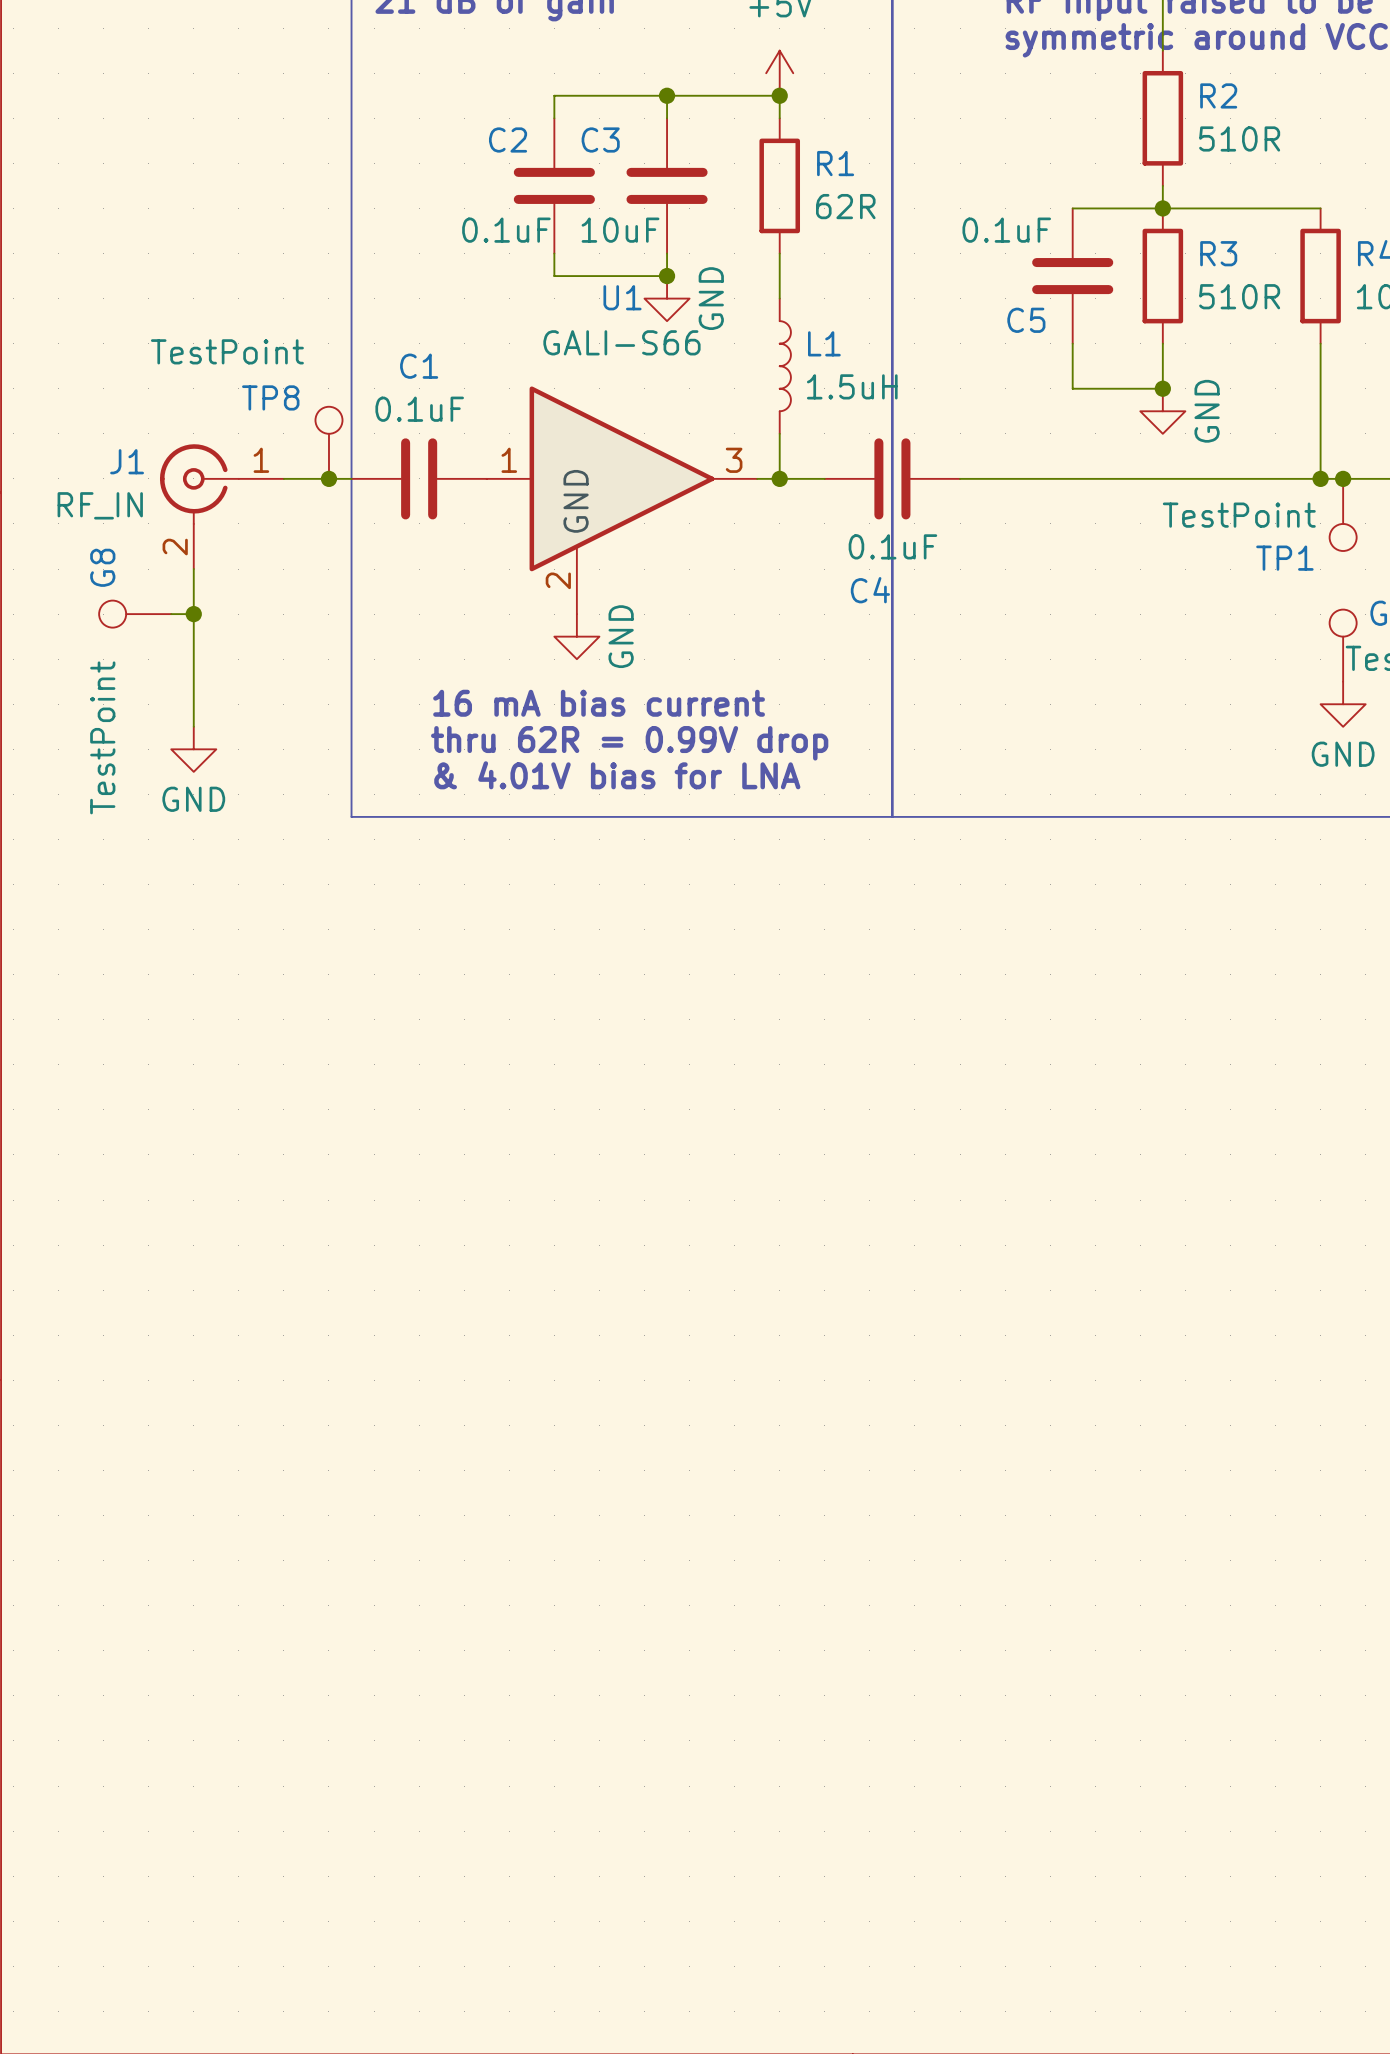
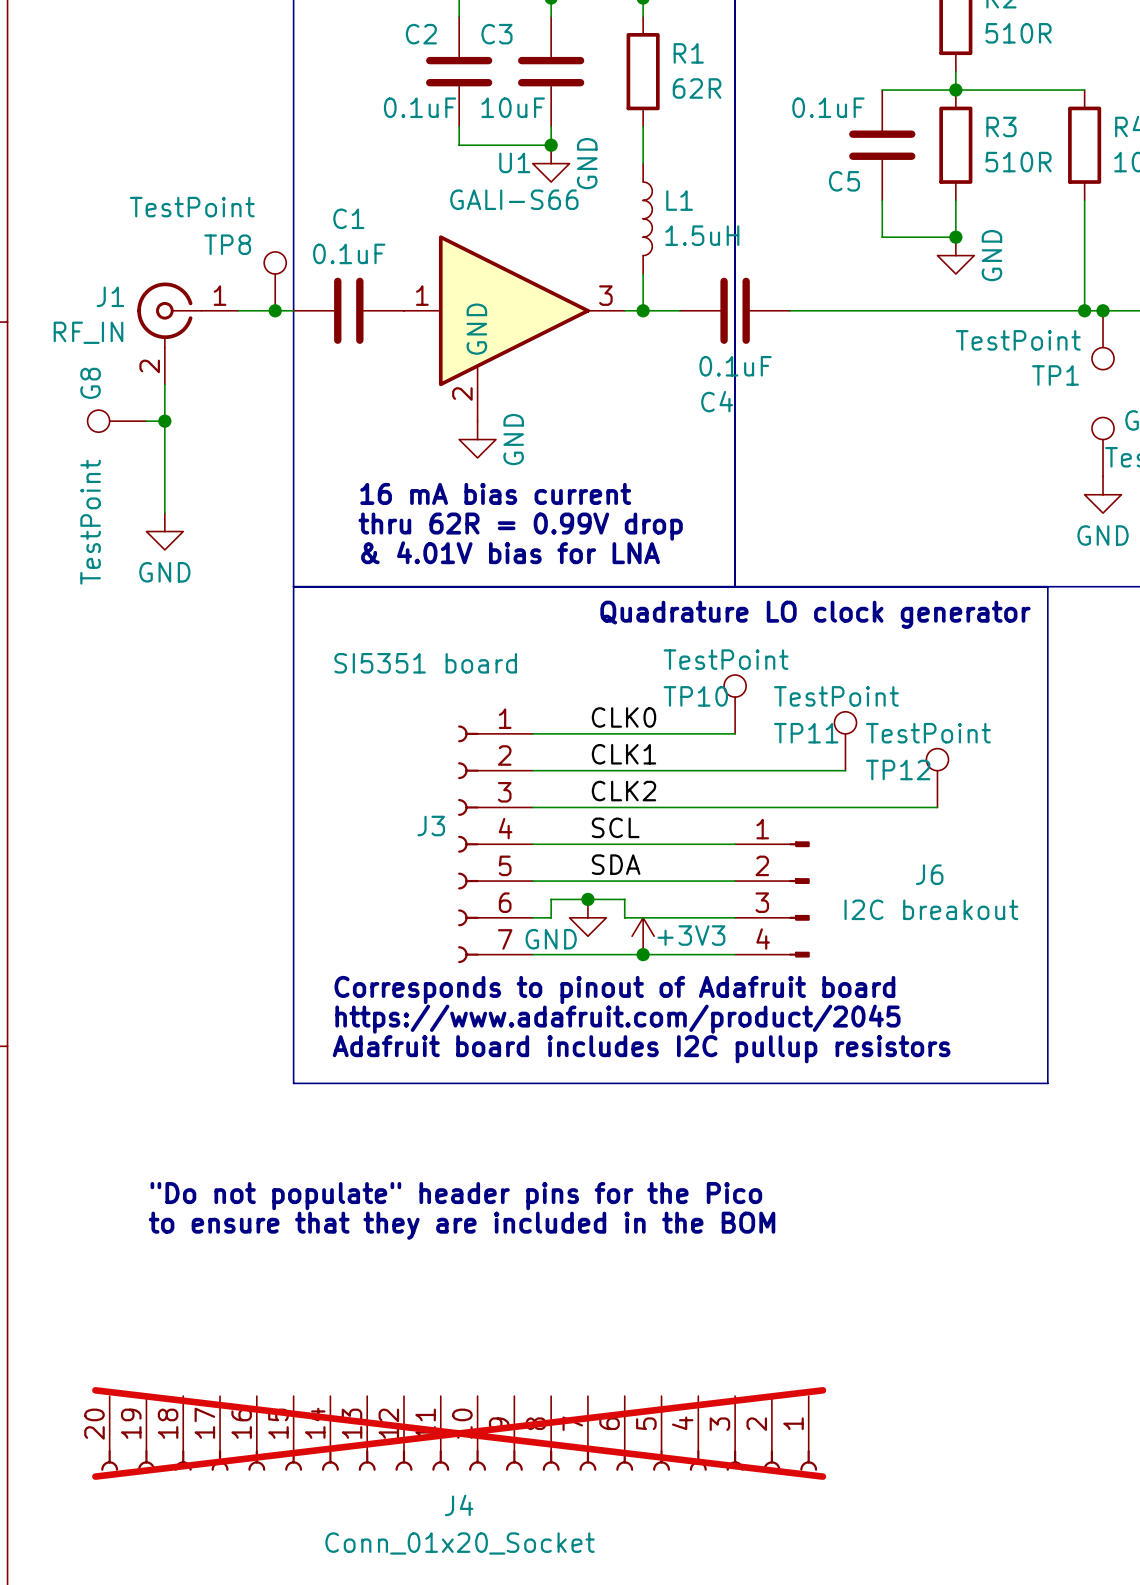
line: none -> (293, 586) (1047, 586) (1047, 1083) (293, 1083) (293, 586)
text: none -> Quadrature LO clock generator (815, 614)
TP10: none -> TestPoint (735, 704)
label: none -> CLK0 (624, 717)
wire: none -> (532, 733) (735, 733)
TP11: none -> TestPoint (845, 741)
label: none -> CLK1 (624, 754)
wire: none -> (532, 770) (845, 770)
TP12: none -> TestPoint (937, 778)
label: none -> CLK2 (624, 791)
wire: none -> (532, 807) (937, 807)
label: none -> SCL (615, 827)
J3: none -> SI5351 board (495, 844)
wire: none -> (532, 844) (735, 844)
label: none -> SDA (616, 864)
wire: none -> (532, 881) (735, 881)
junction: none -> (587, 899)
J6: none -> I2C breakout (772, 899)
wire: none -> (532, 917) (551, 917) (551, 899) (624, 899) (624, 917) (735, 917)
power symbol: none -> GND (587, 917)
power symbol: none -> +3V3 (643, 936)
wire: none -> (532, 954) (735, 954)
junction: none -> (643, 954)
text: none -> Corresponds to pinout of Adafruit board (614, 989)
text: none -> https://www.adafruit.com/product/2045 (617, 1019)
text: none -> Adafruit board includes I2C pullup resistors (641, 1049)
text: none -> "Do not populate" header pins for the Pico (456, 1196)
text: none -> to ensure that they are included in the BOM (462, 1225)
J4: none -> Conn_01x20_Socket (459, 1433)

